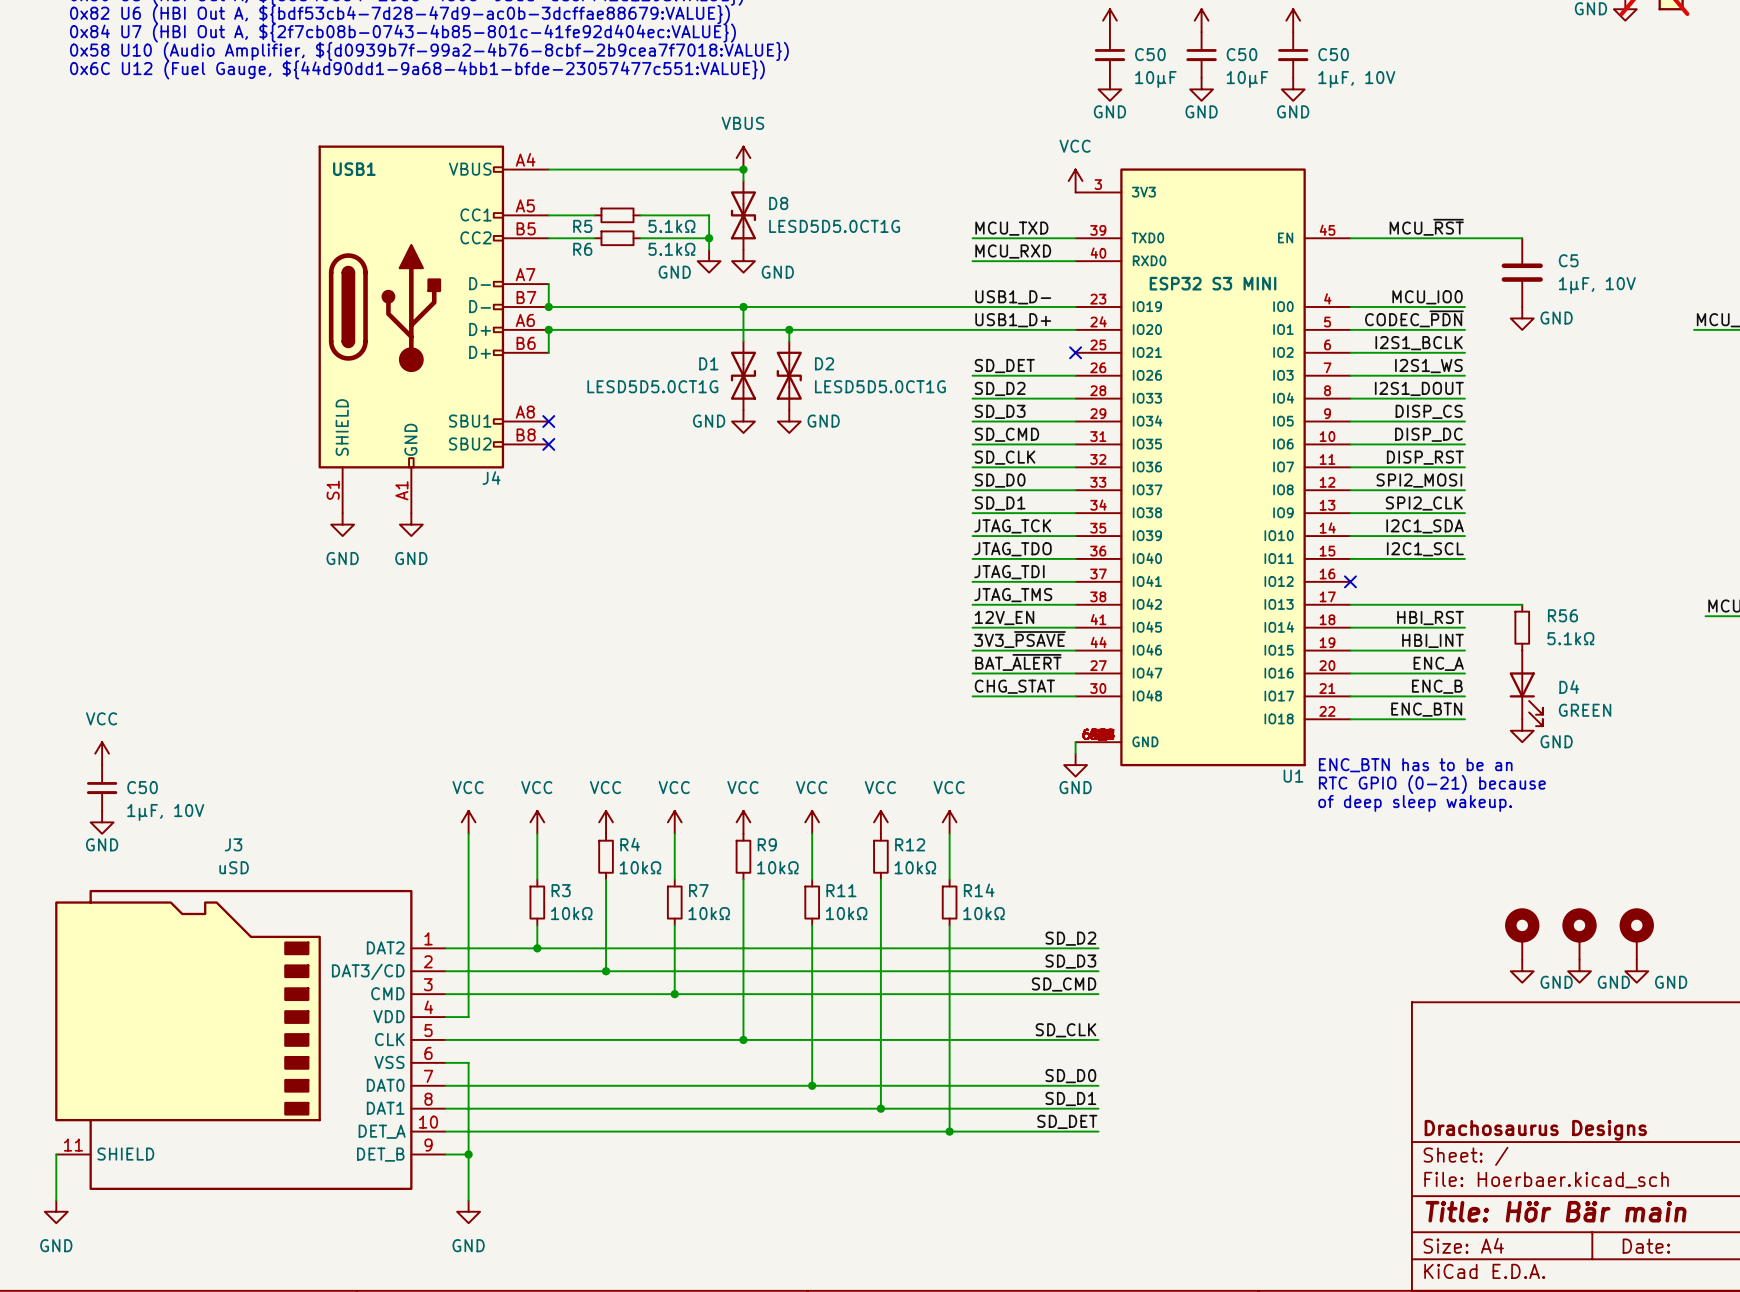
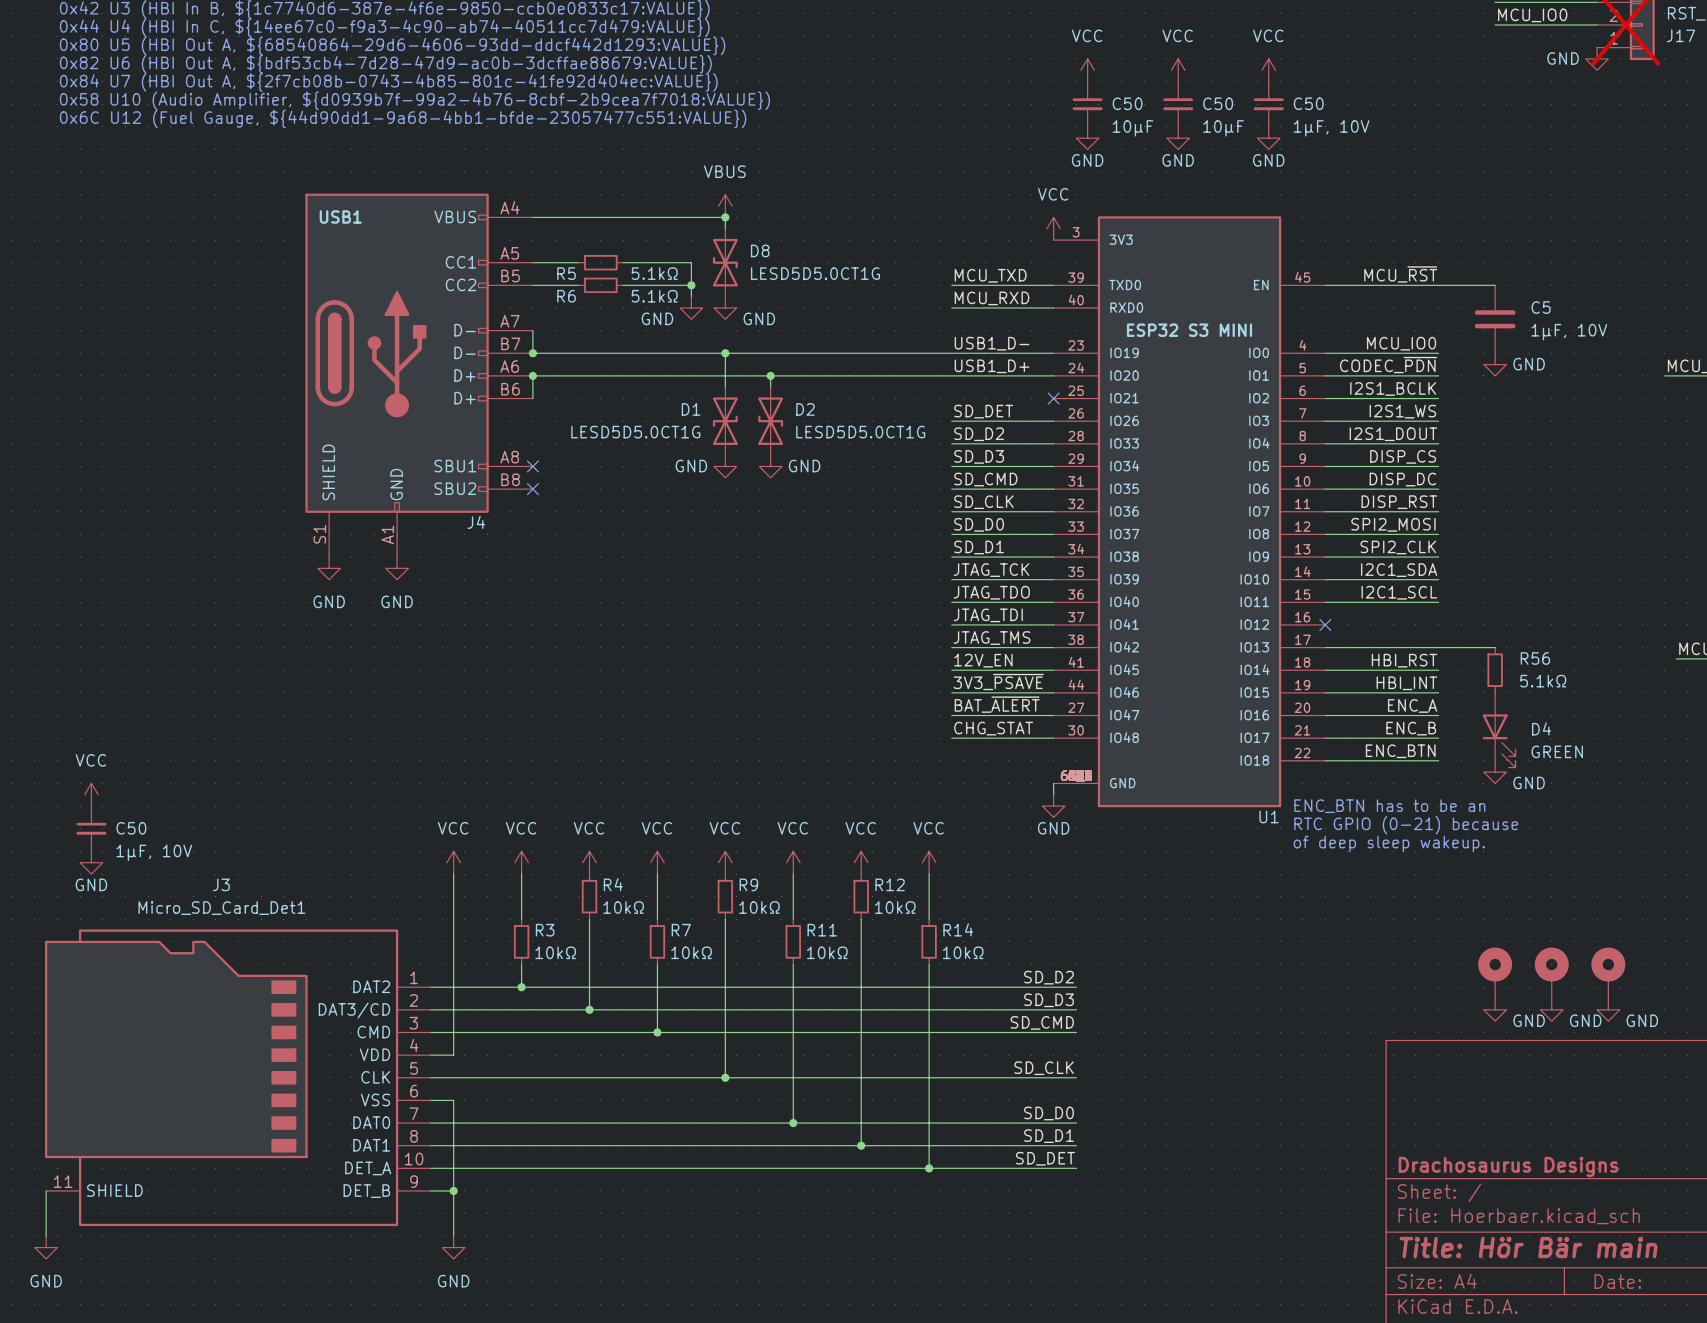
J3 value: uSD (234, 867) -> Micro_SD_Card_Det1 (221, 908)

